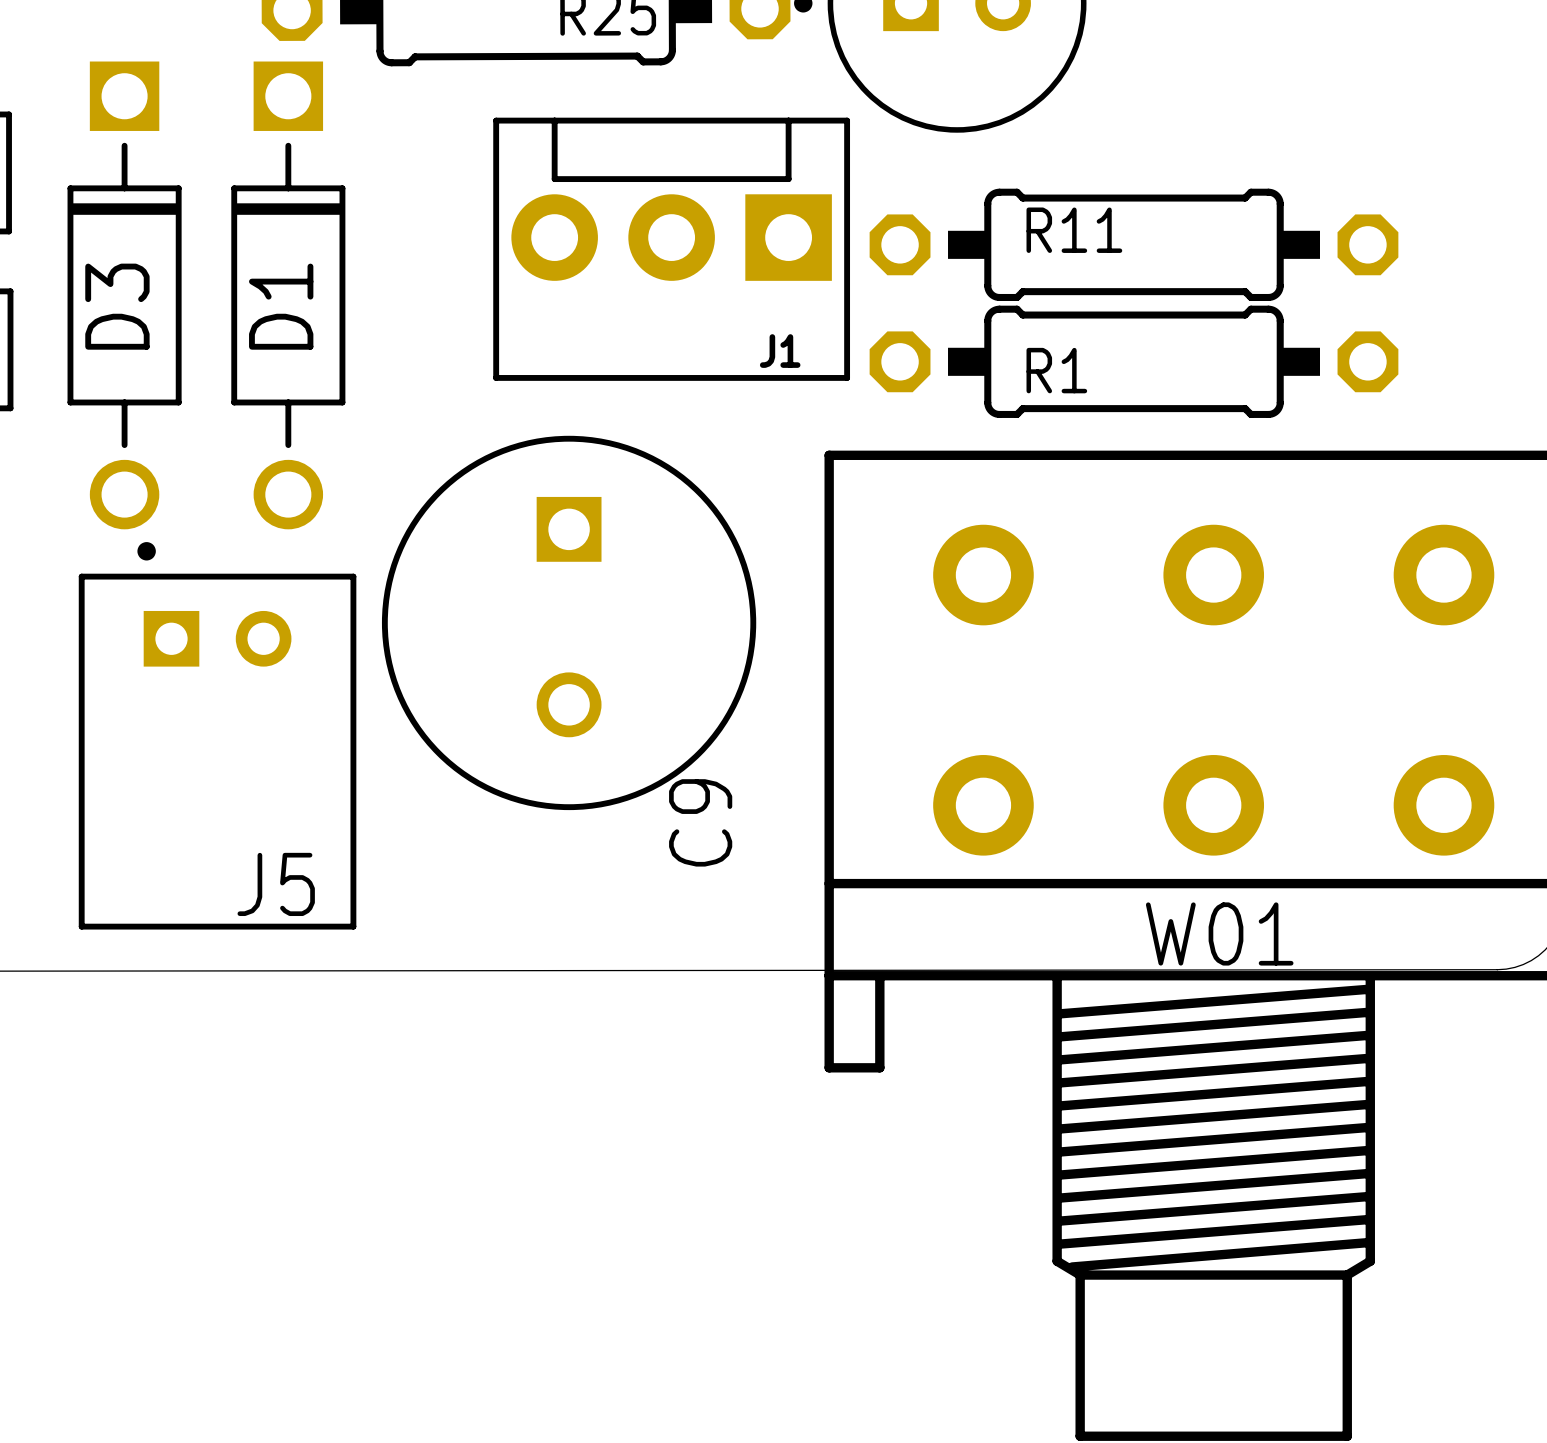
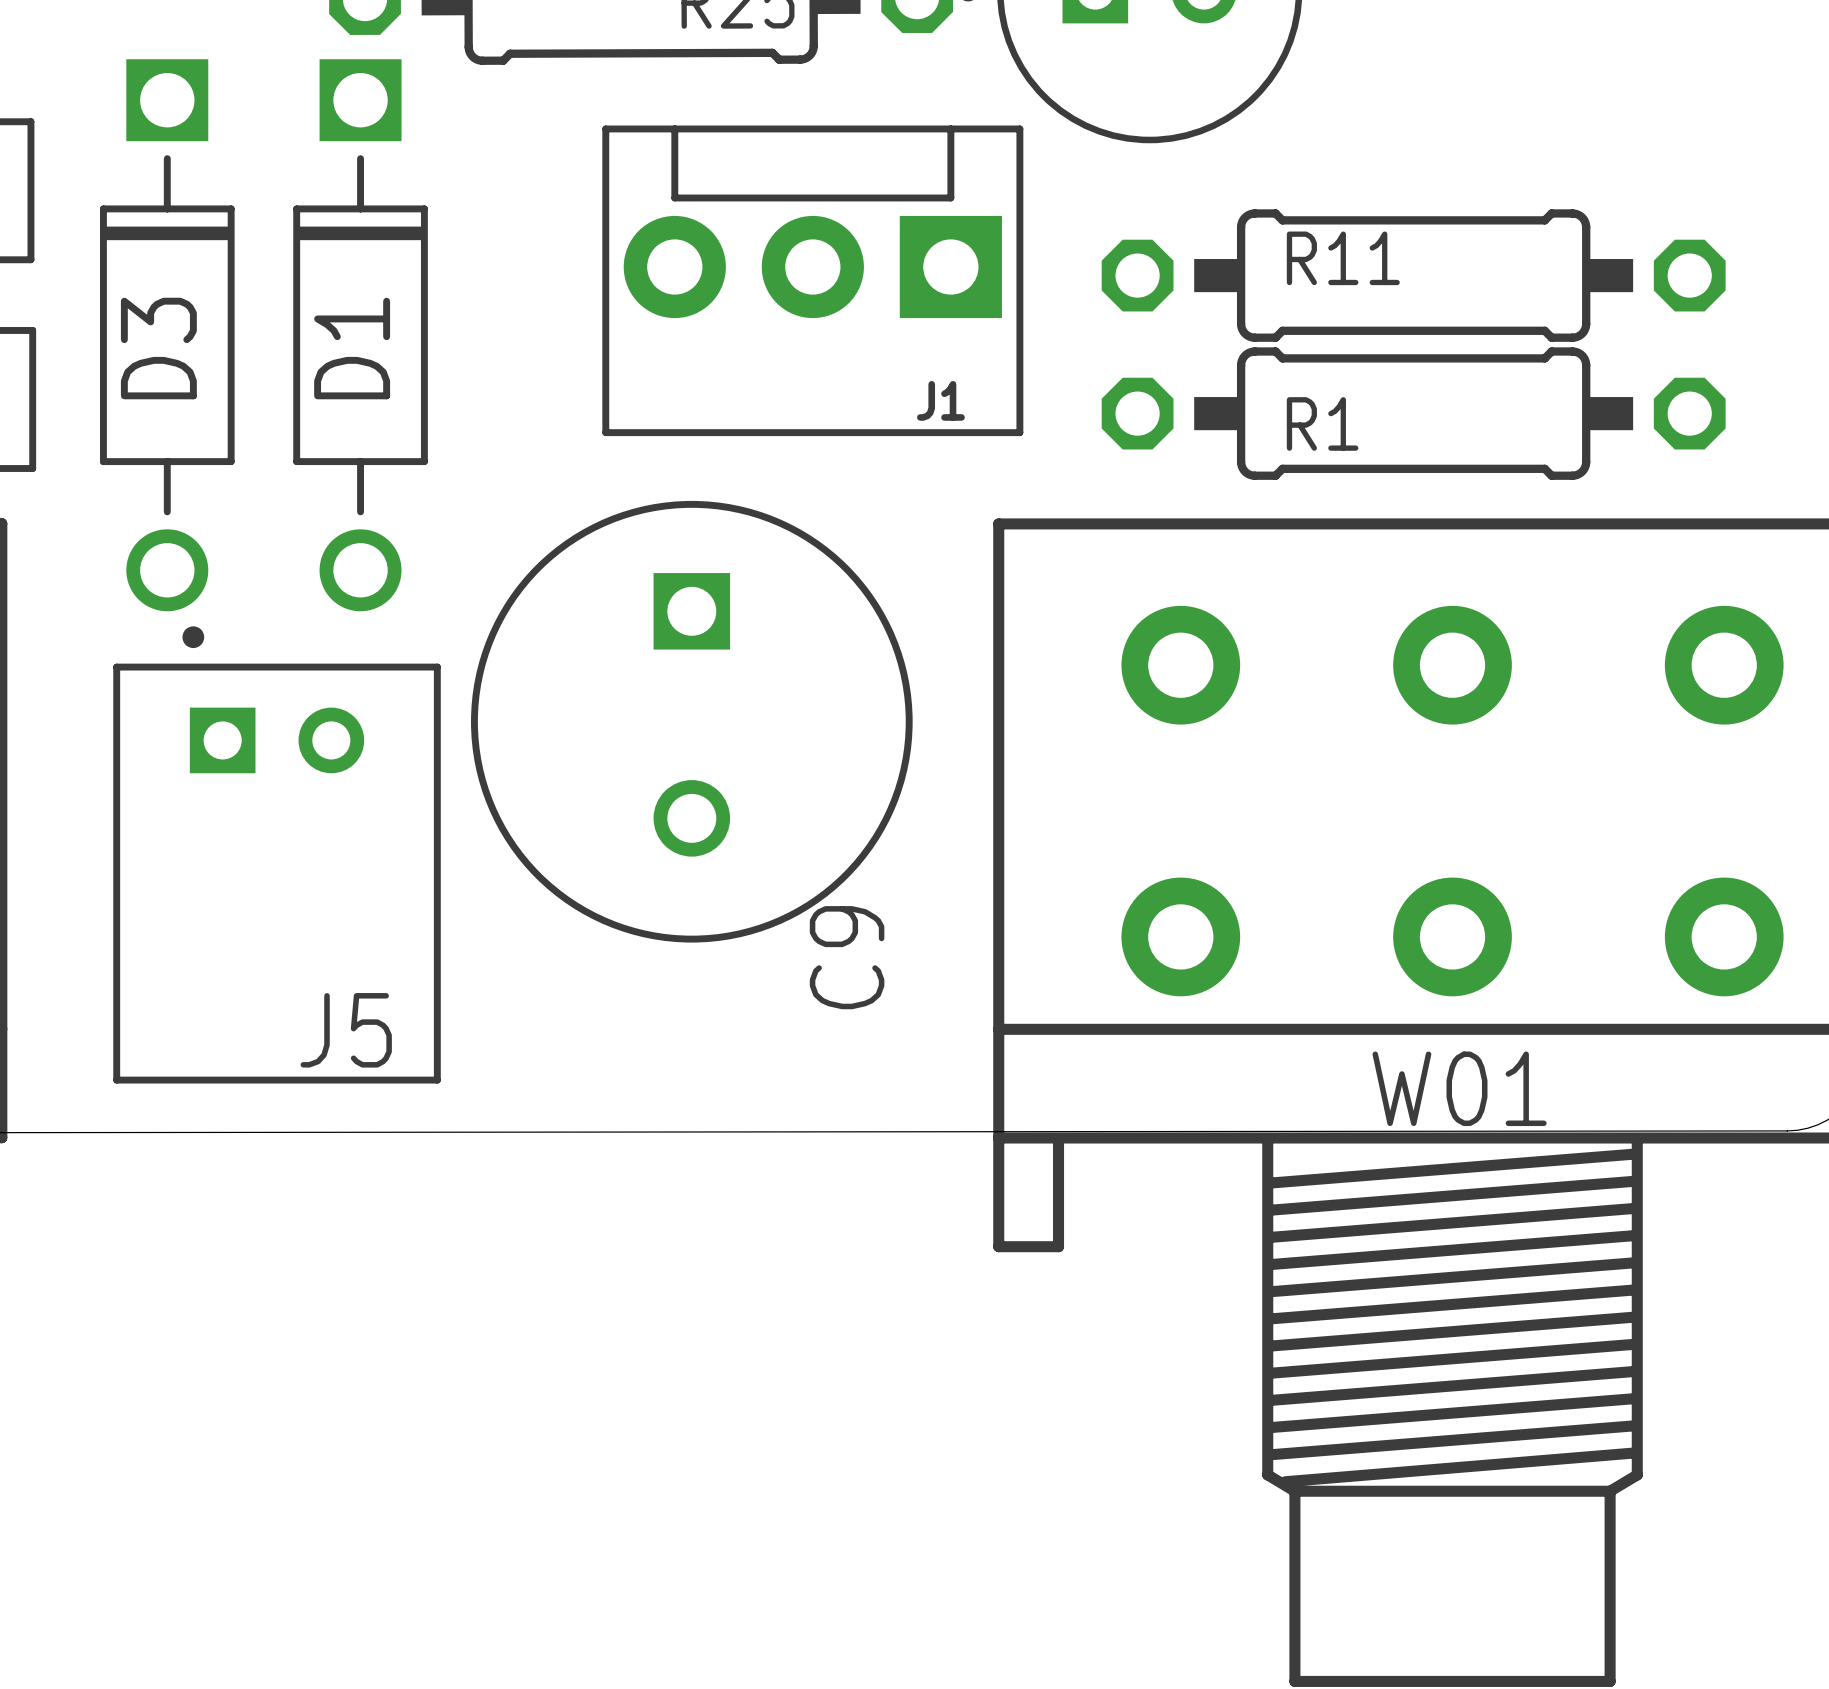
R11 position: (1134, 244) -> (1413, 275)
R1 position: (1134, 361) -> (1413, 413)

